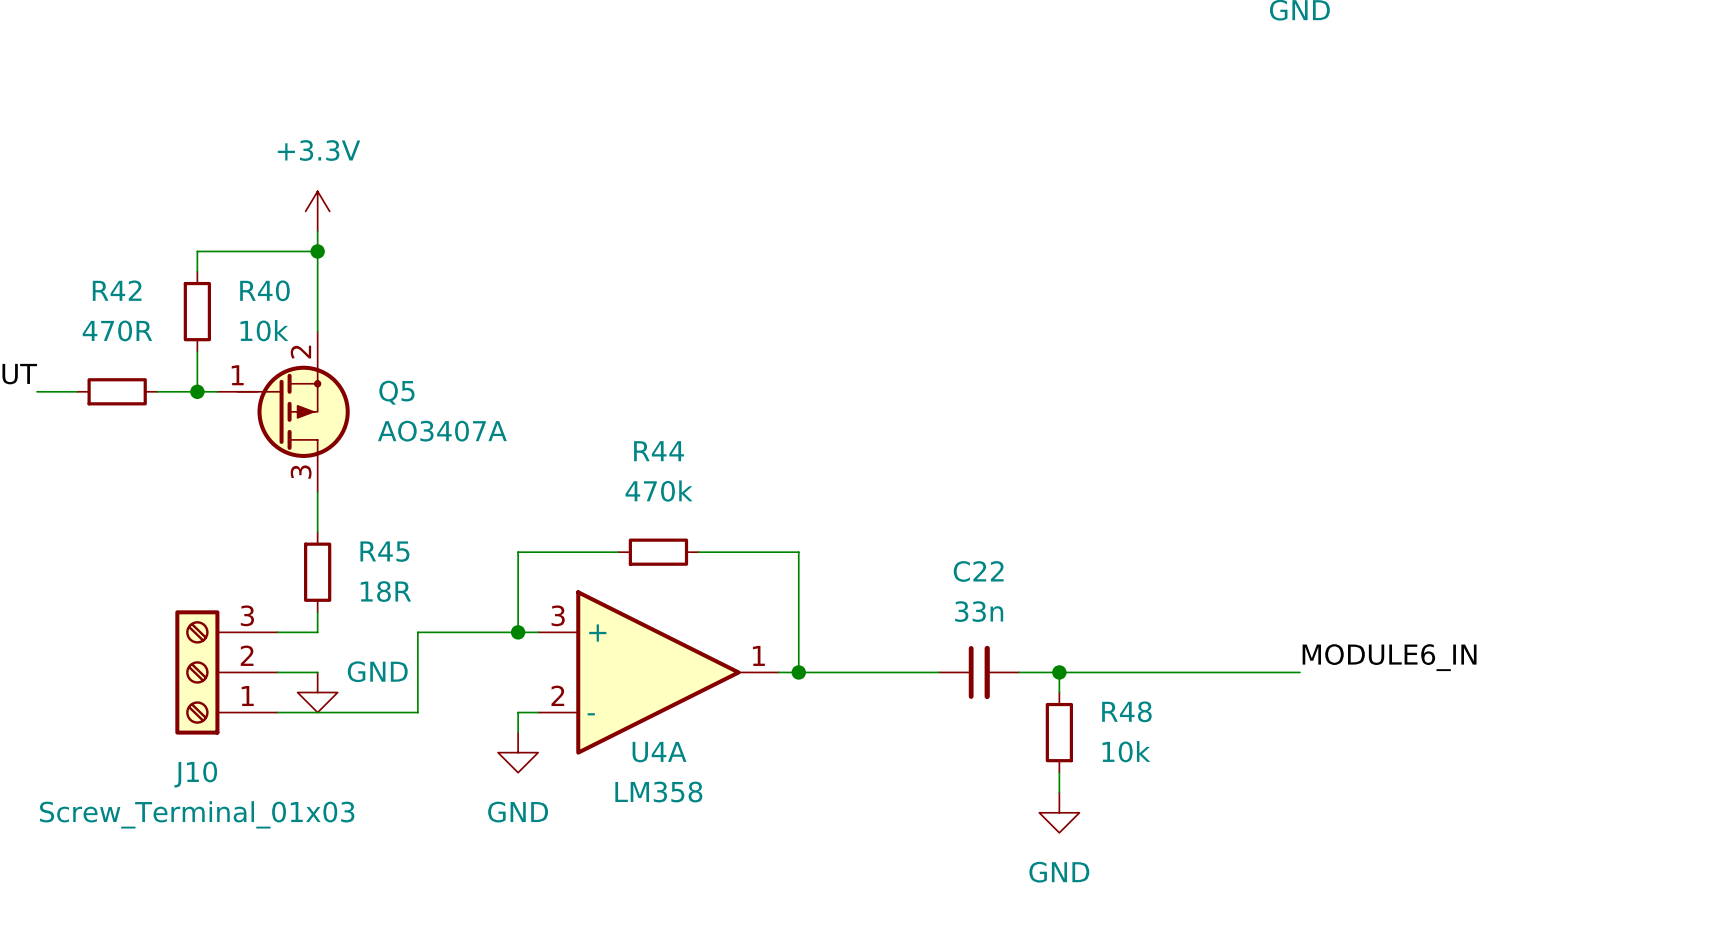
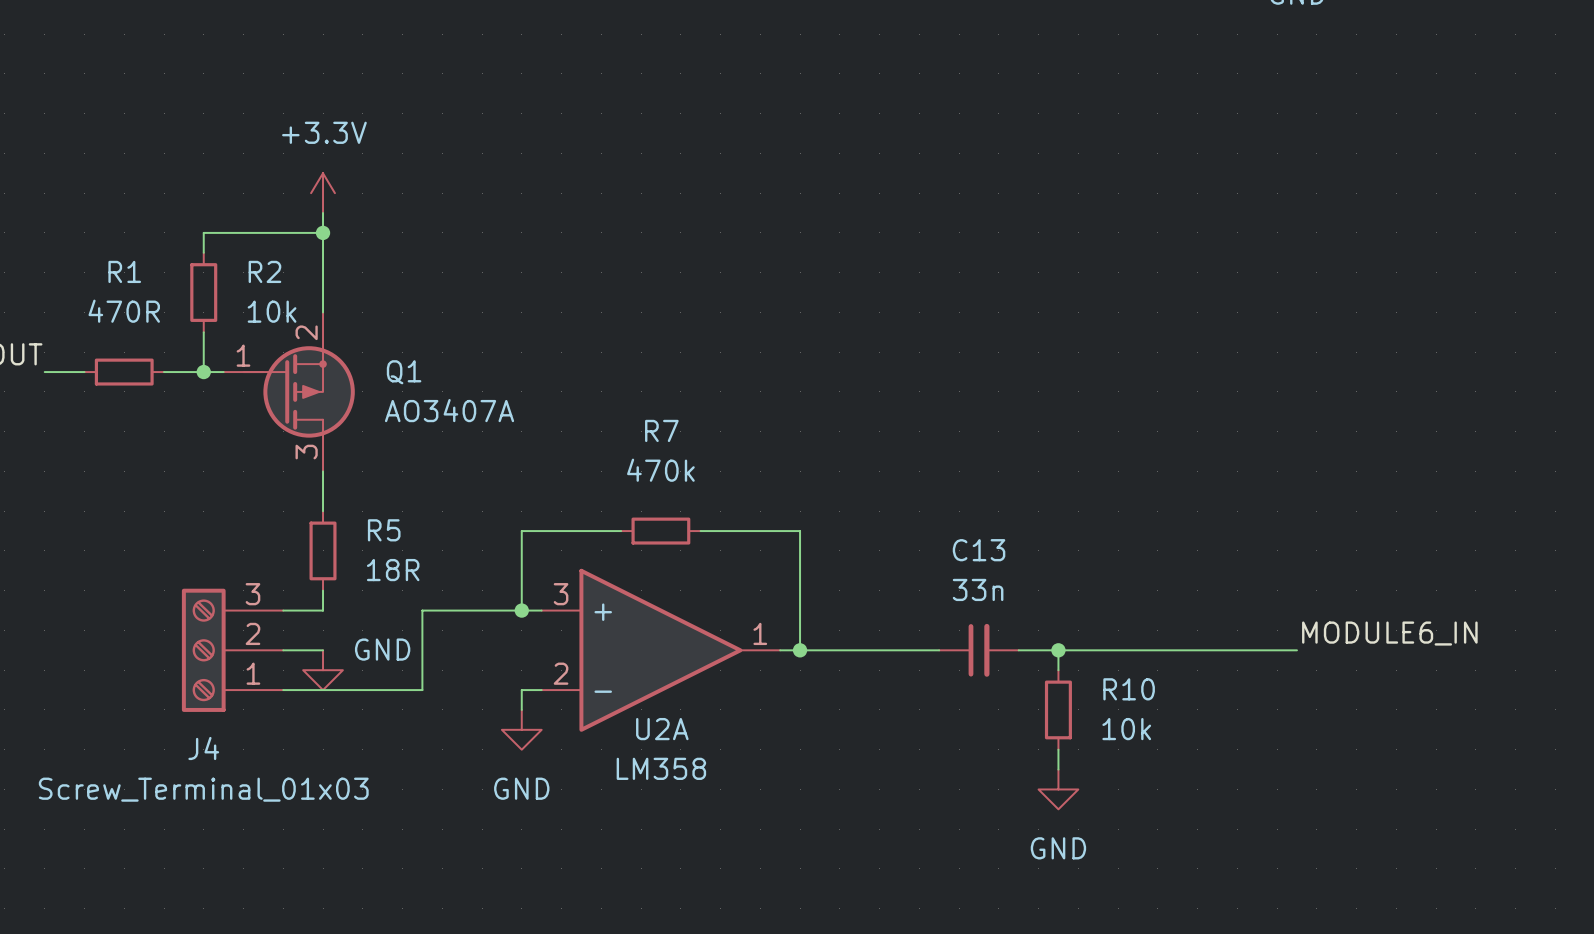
R42 name: R42 (117, 290) -> R1 (124, 271)
R40 name: R40 (264, 290) -> R2 (264, 271)
Q5 name: Q5 (396, 392) -> Q1 (404, 372)
R44 name: R44 (659, 451) -> R7 (661, 430)
R45 name: R45 (384, 551) -> R5 (384, 530)
C22 name: C22 (978, 571) -> C13 (979, 550)
R48 name: R48 (1126, 711) -> R10 (1129, 689)
U4A name: U4A (659, 752) -> U2A (662, 729)
J10 name: J10 (195, 774) -> J4 (203, 748)

